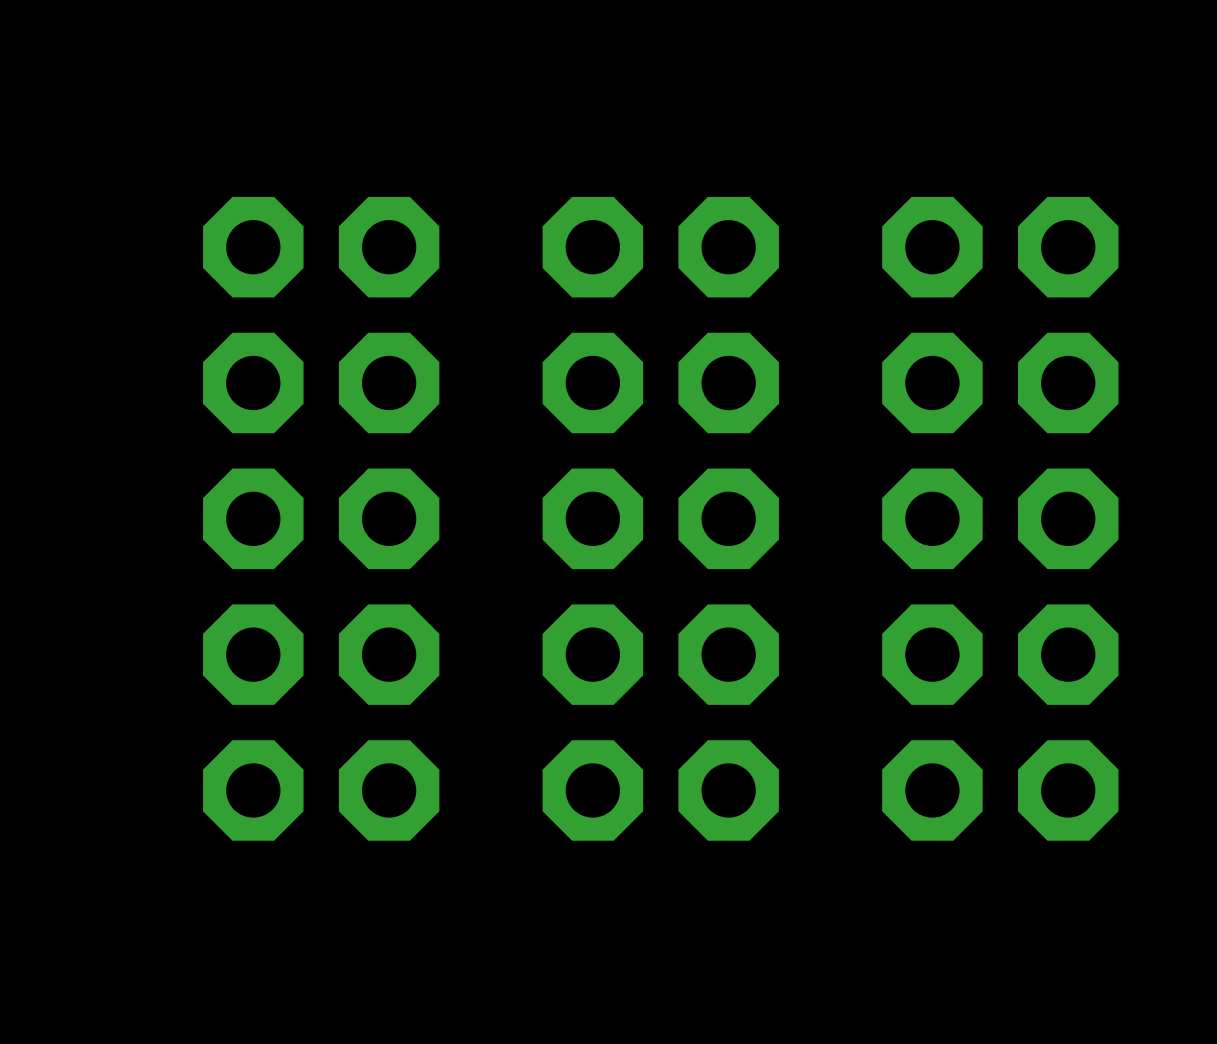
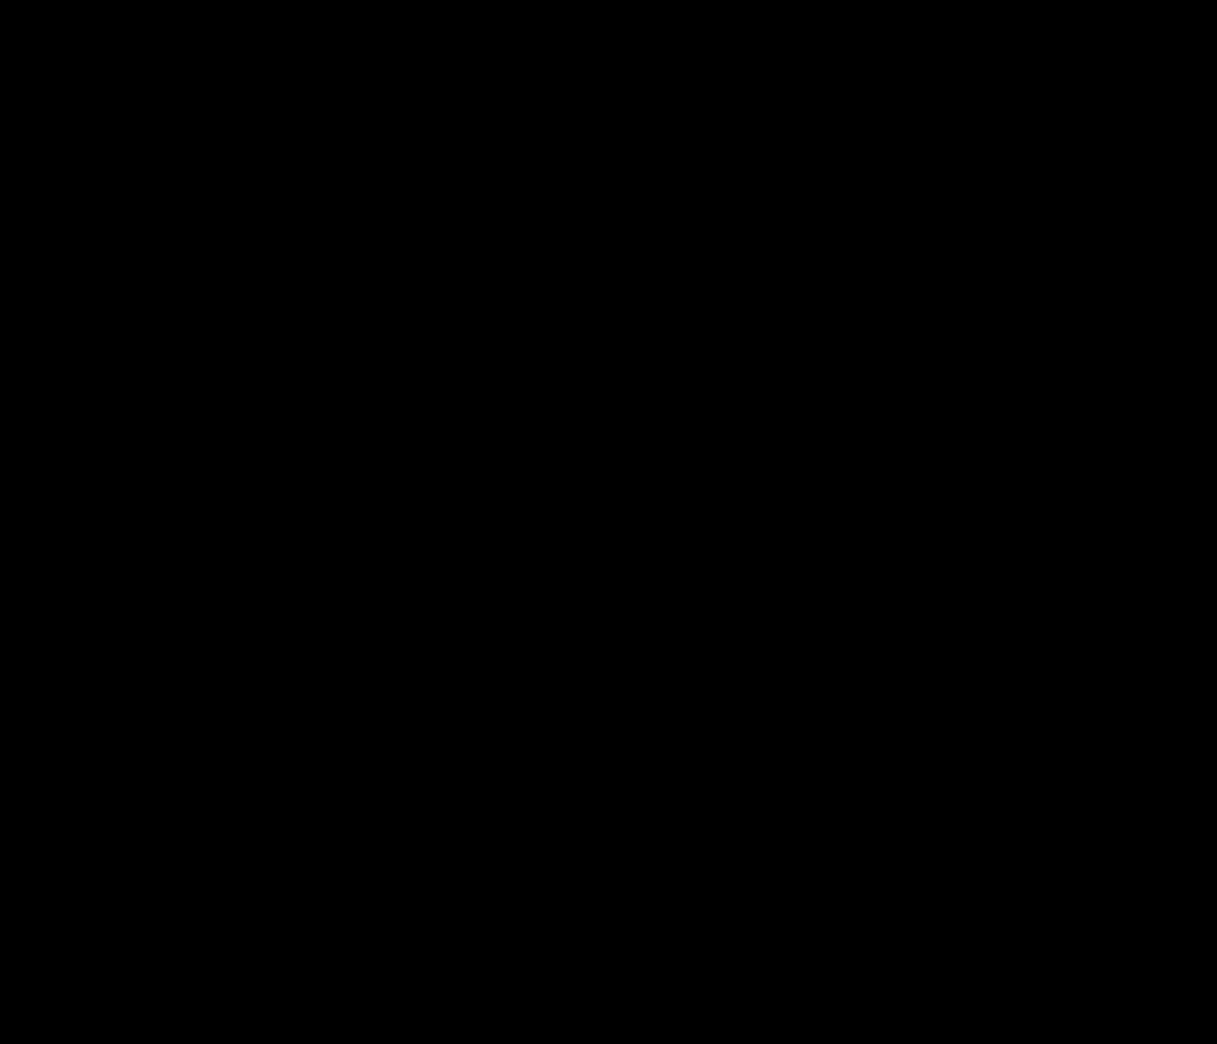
part: (321, 518) -> none
part: (660, 518) -> none
part: (1000, 518) -> none

